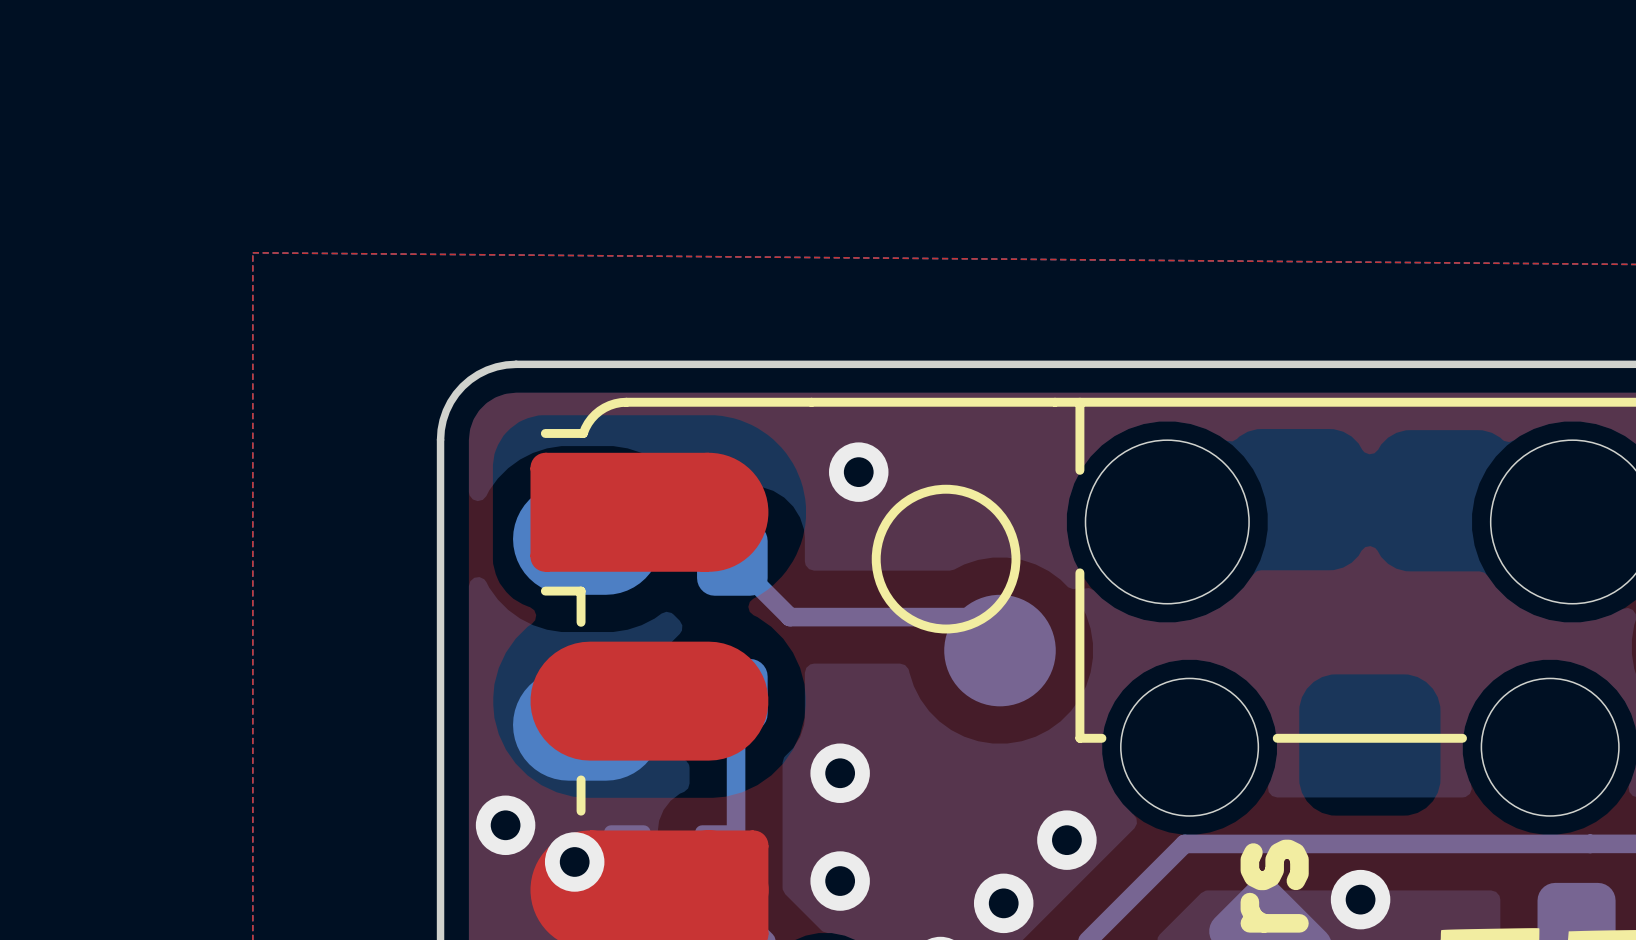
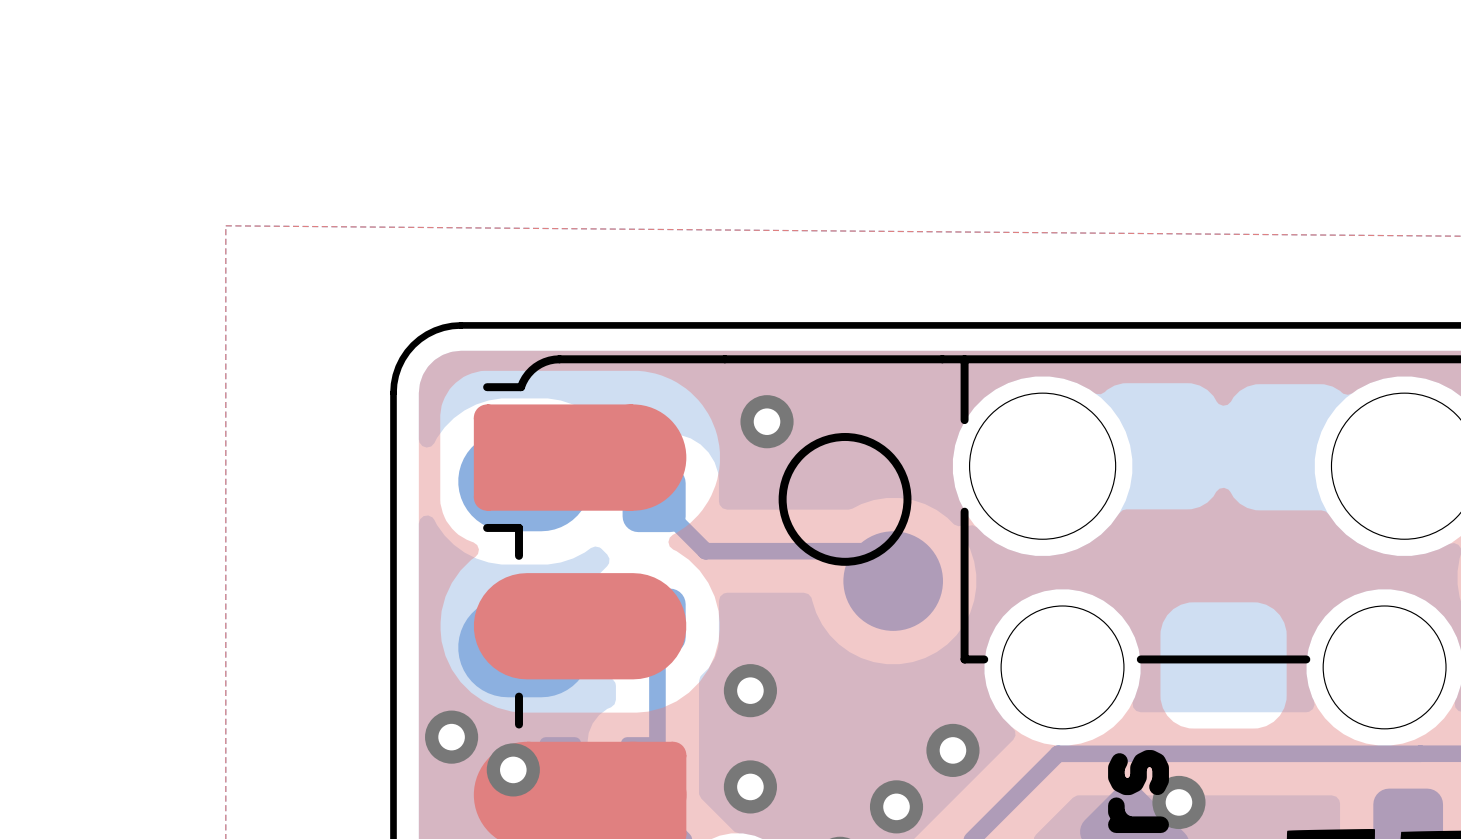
via position: (1360, 899) -> (1178, 802)

